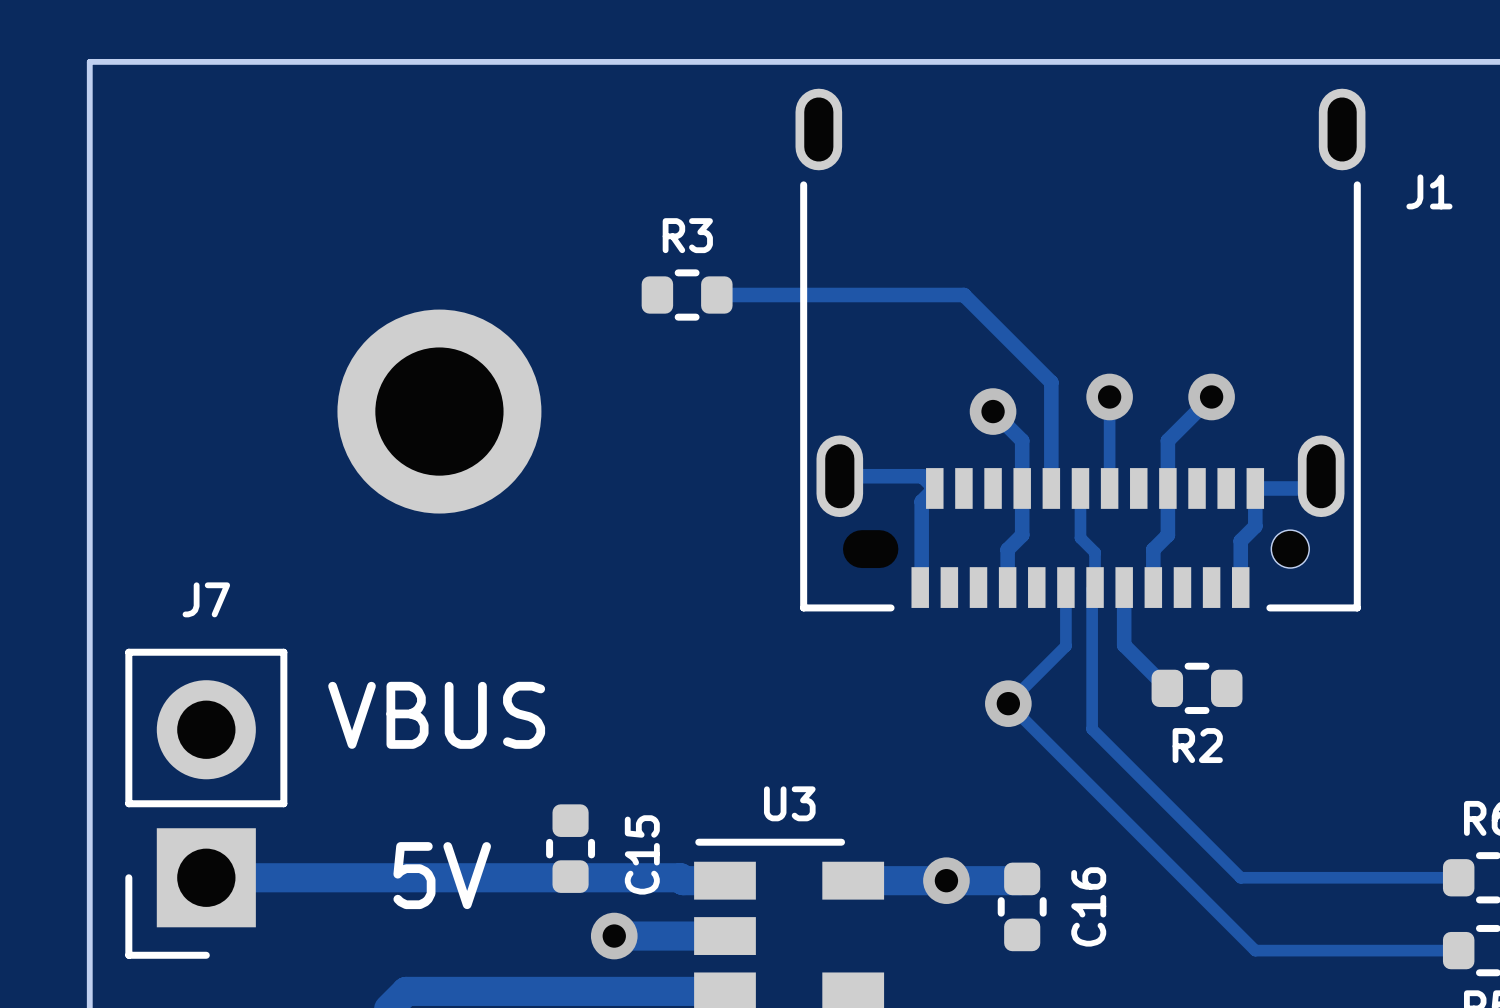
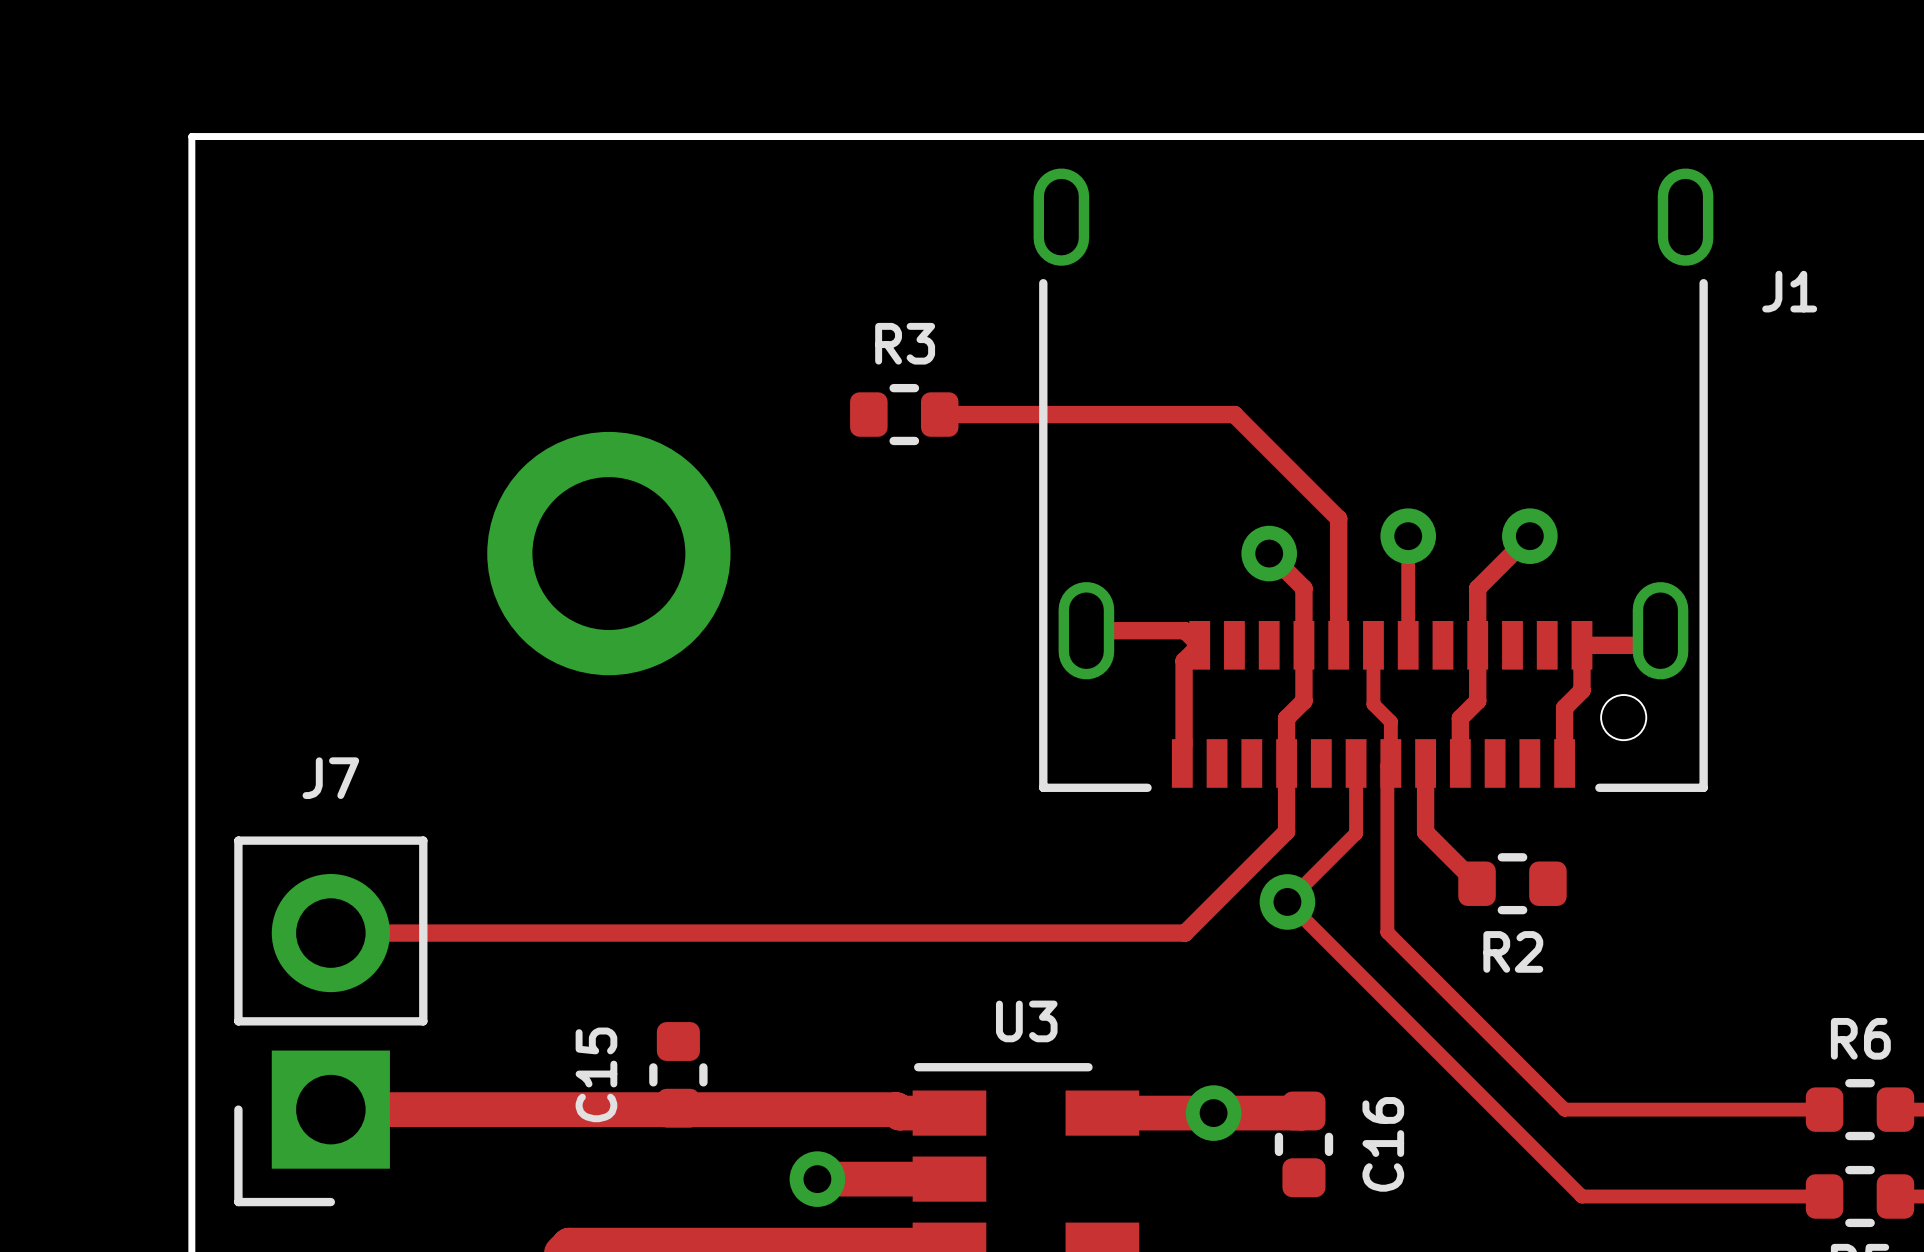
track: none -> (1286, 763) (1286, 831) (1185, 933) (330, 933)
text: VBUS (436, 715) -> none
C15 position: (570, 848) -> (678, 1074)
C15 name position: C15 (642, 854) -> C15 (596, 1074)
text: 5V (442, 875) -> none

